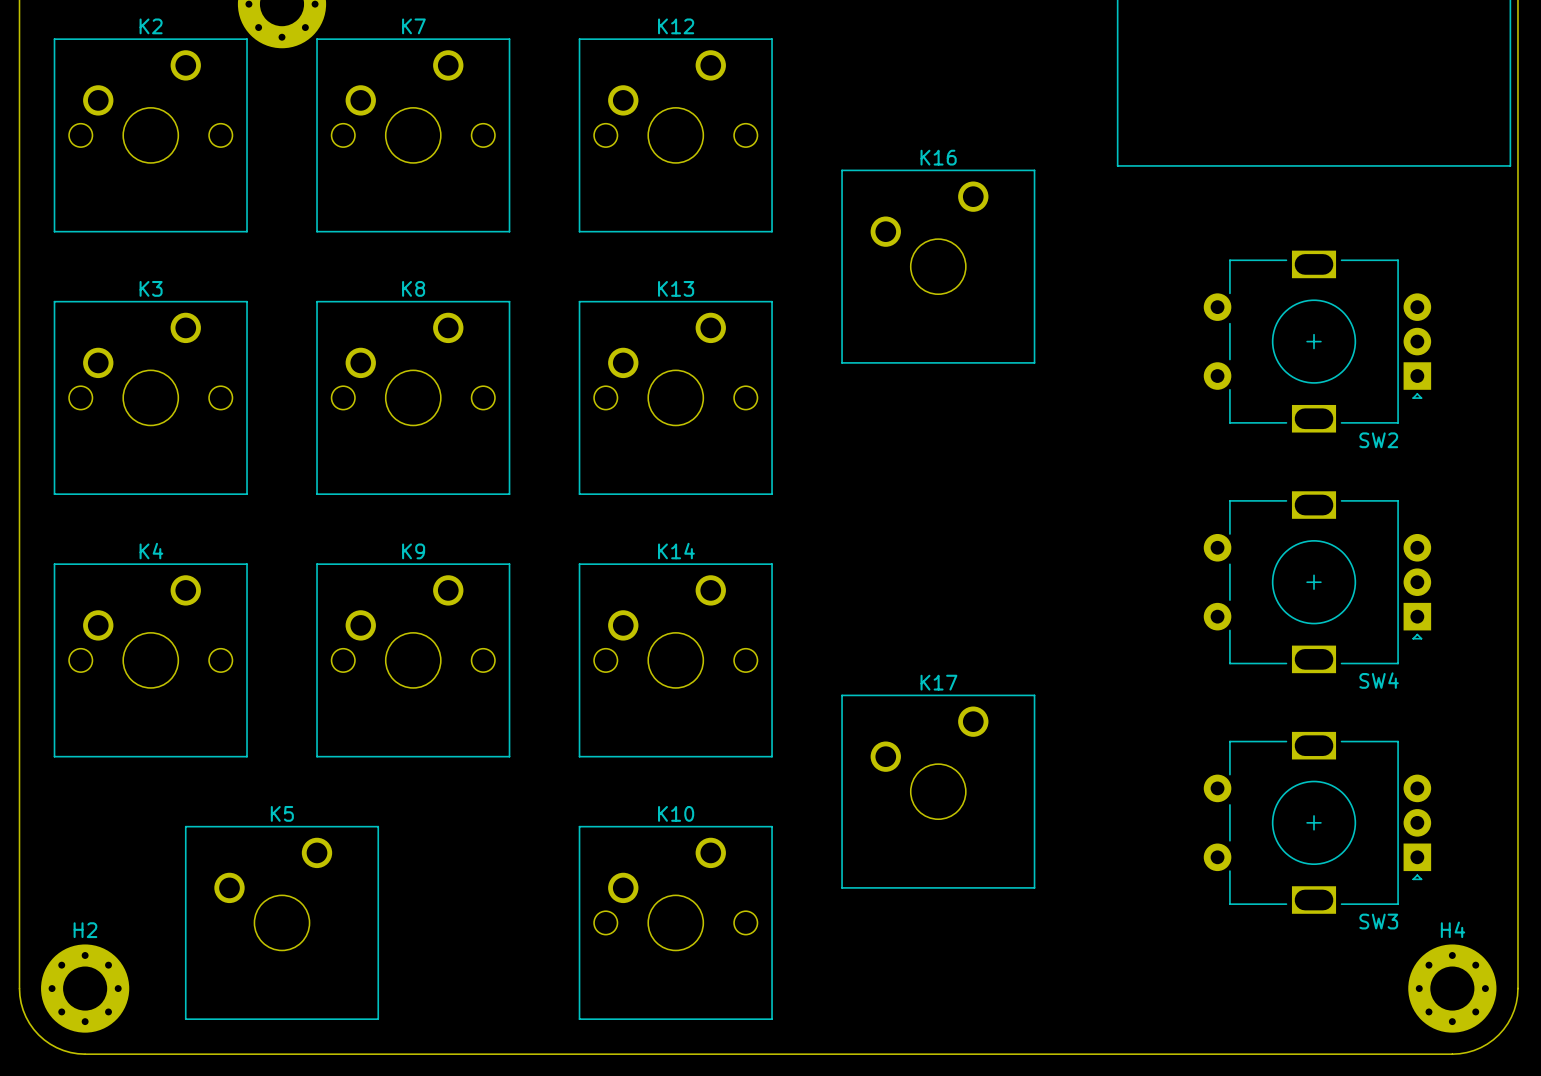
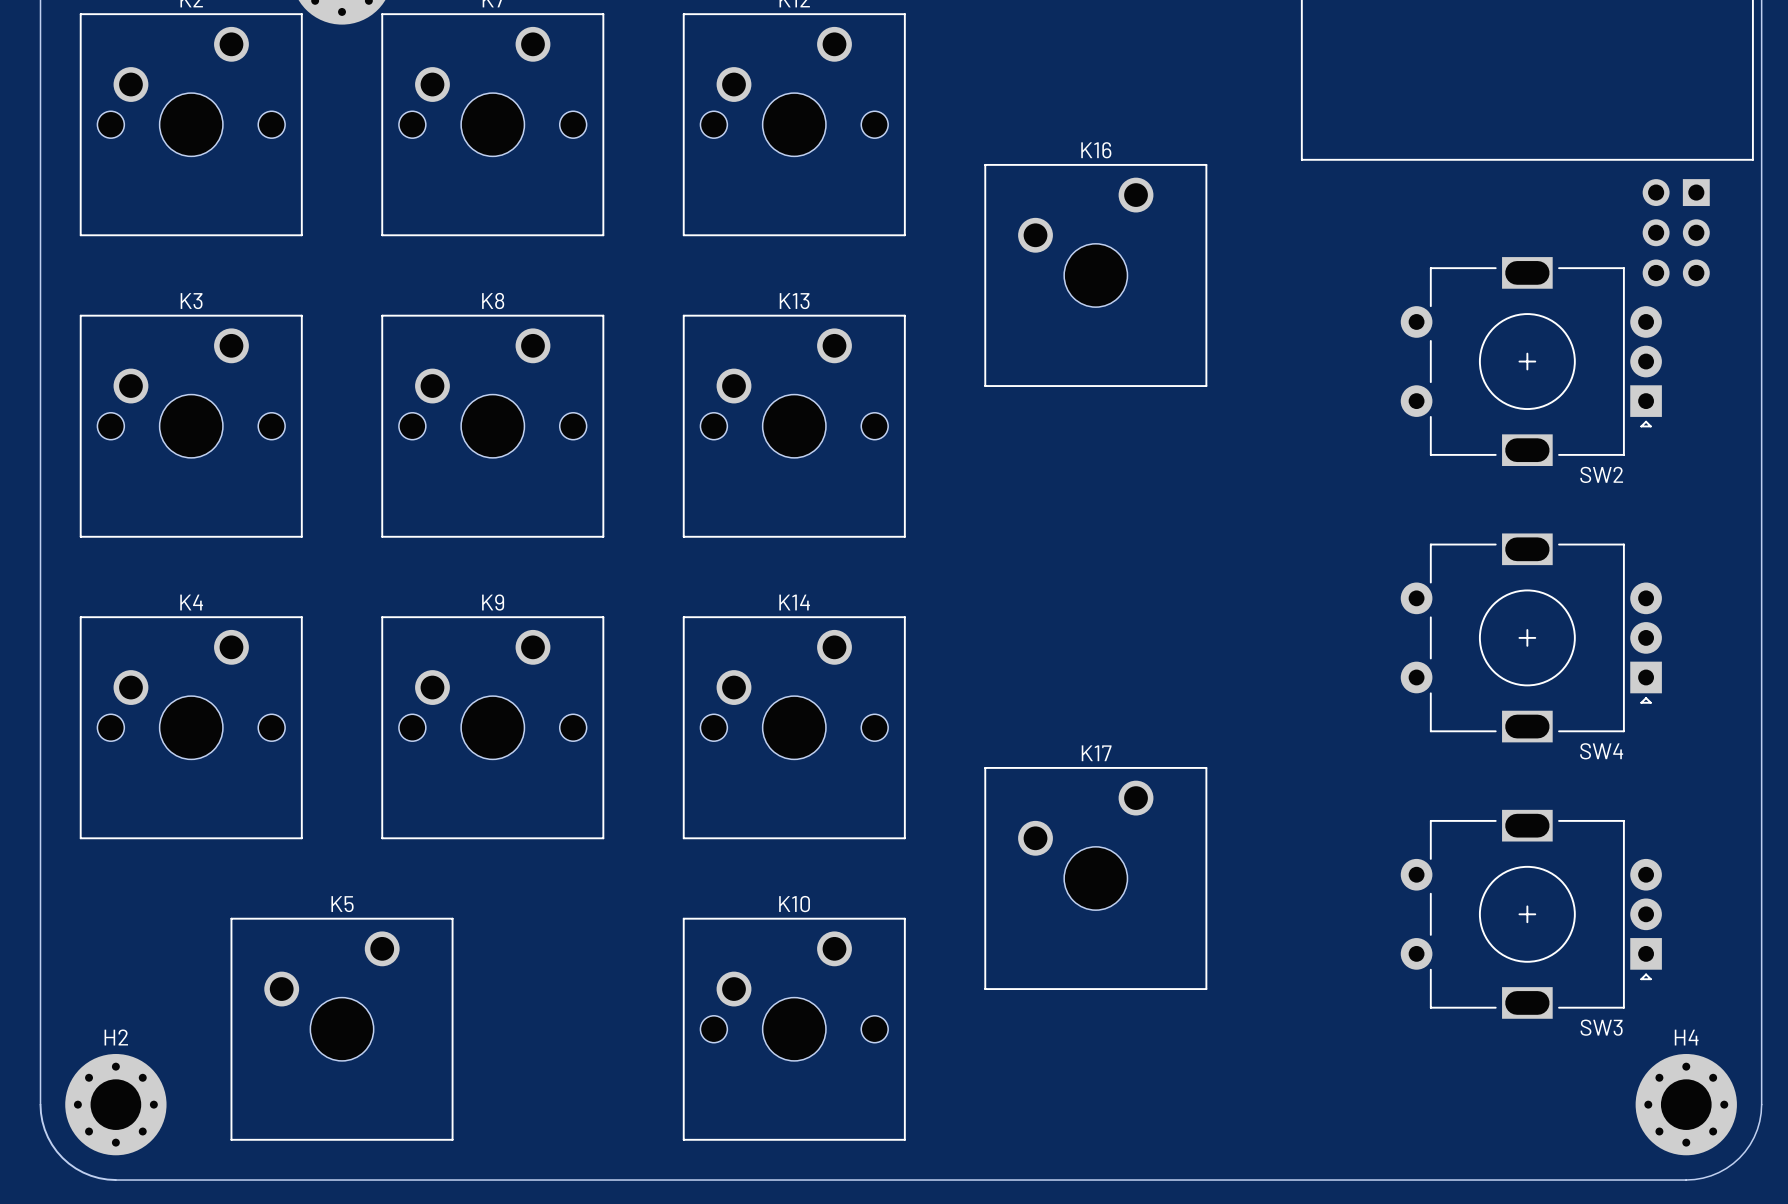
part: none -> (1676, 232)

